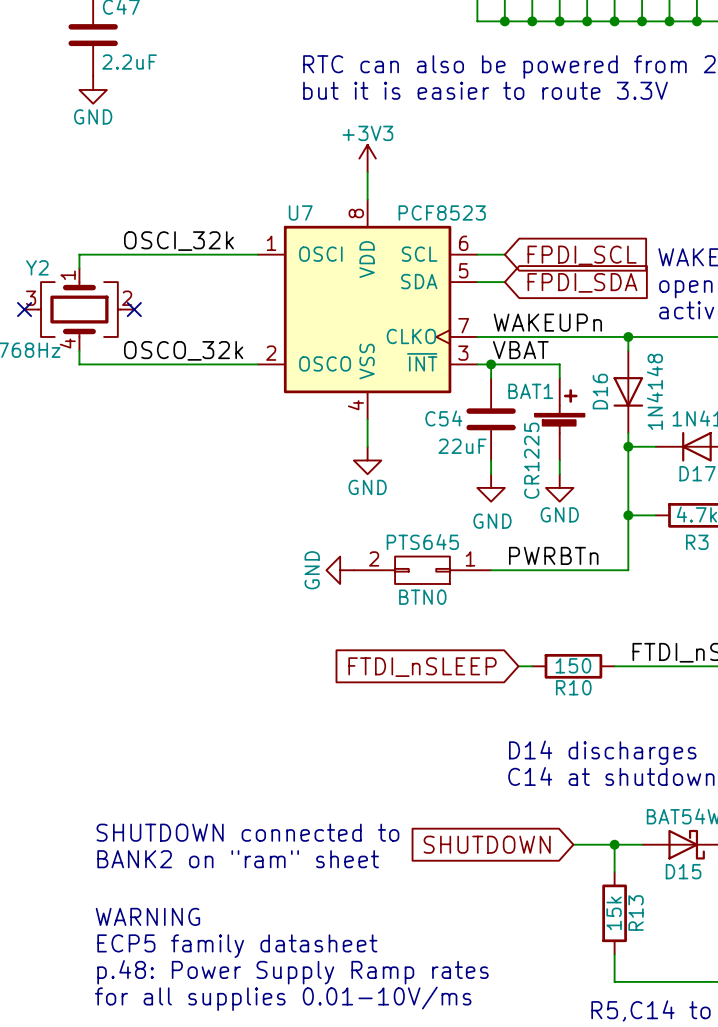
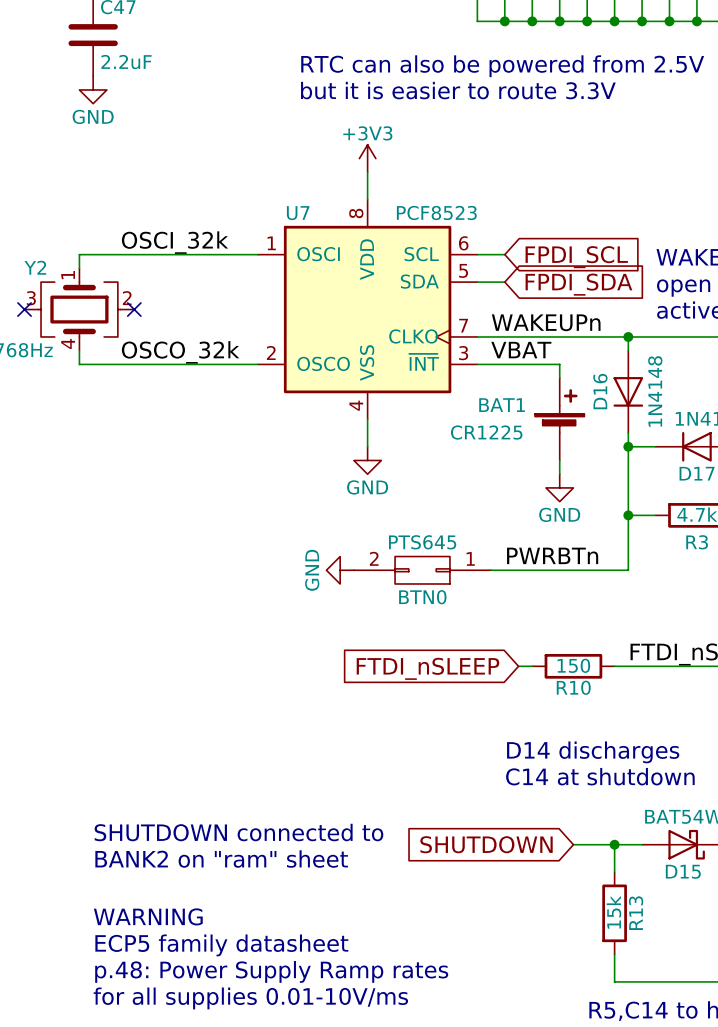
wire: (491, 364) (491, 378) -> none
junction: (491, 364) -> none
BAT1 name position: BAT1 (530, 391) -> BAT1 (502, 405)
C54: 22uF (491, 419) -> none
wire: (491, 460) (491, 474) -> none
BAT1 value rotation: 0° (531, 460) -> 90° clockwise (486, 432)
power symbol: GND (491, 487) -> none

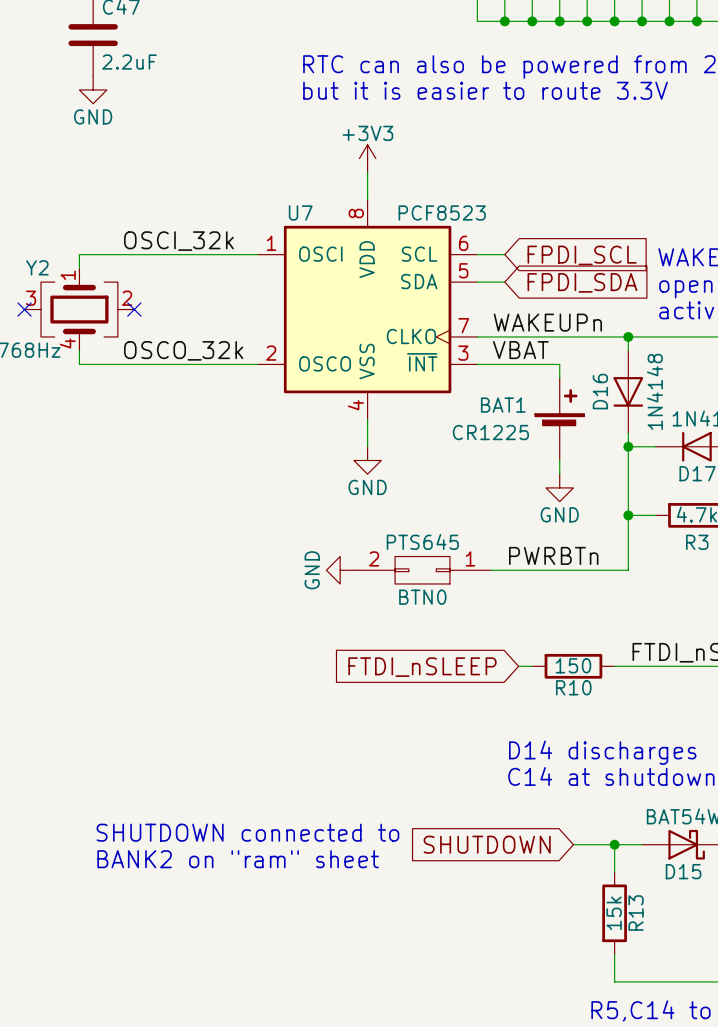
text: WARNING (148, 916) -> none
text: ECP5 family datasheet (221, 945) -> none
text: p.48: Power Supply Ramp rates (271, 971) -> none
text: for all supplies 0.01-10V/ms (250, 998) -> none

